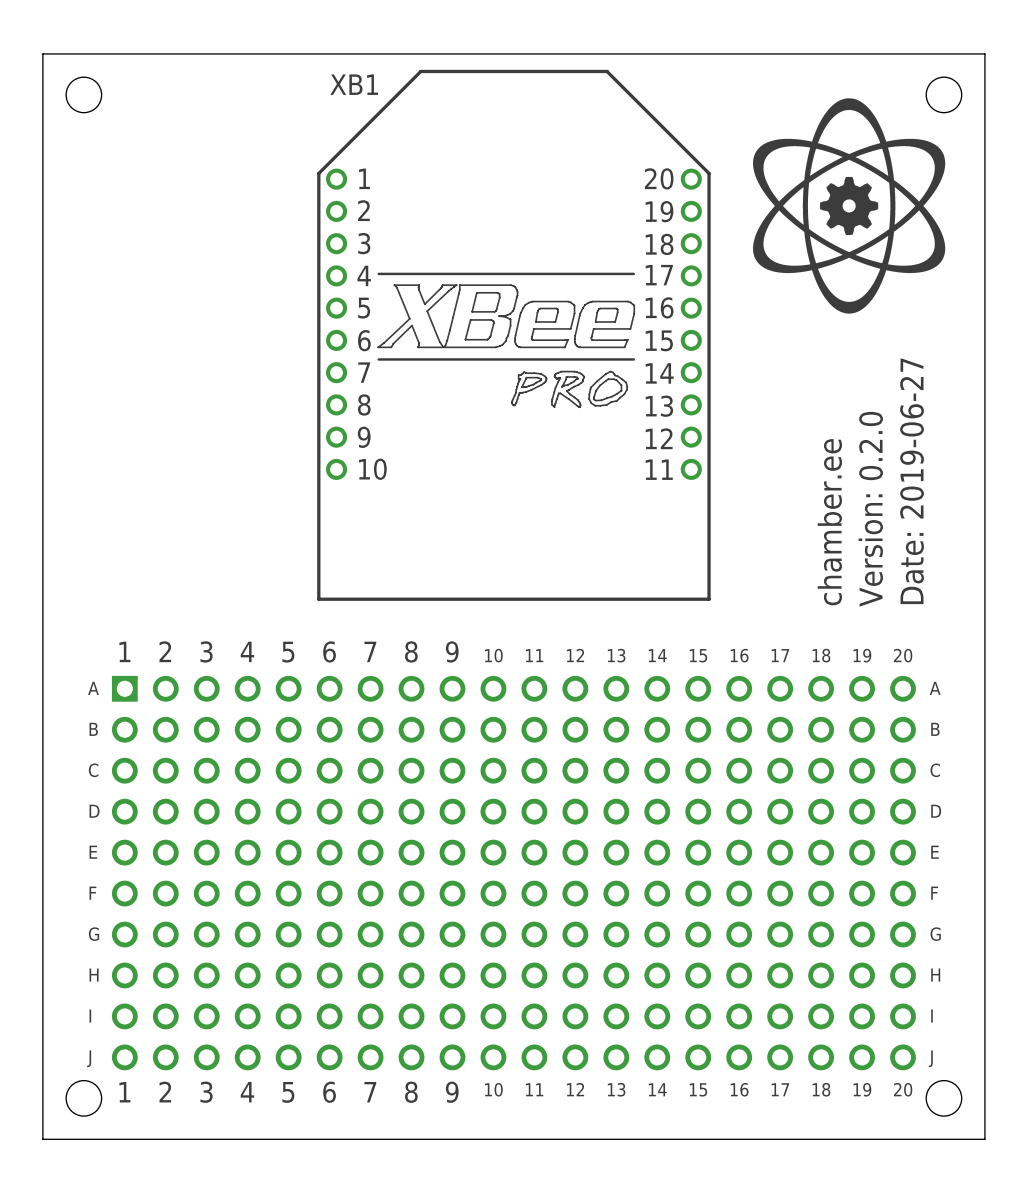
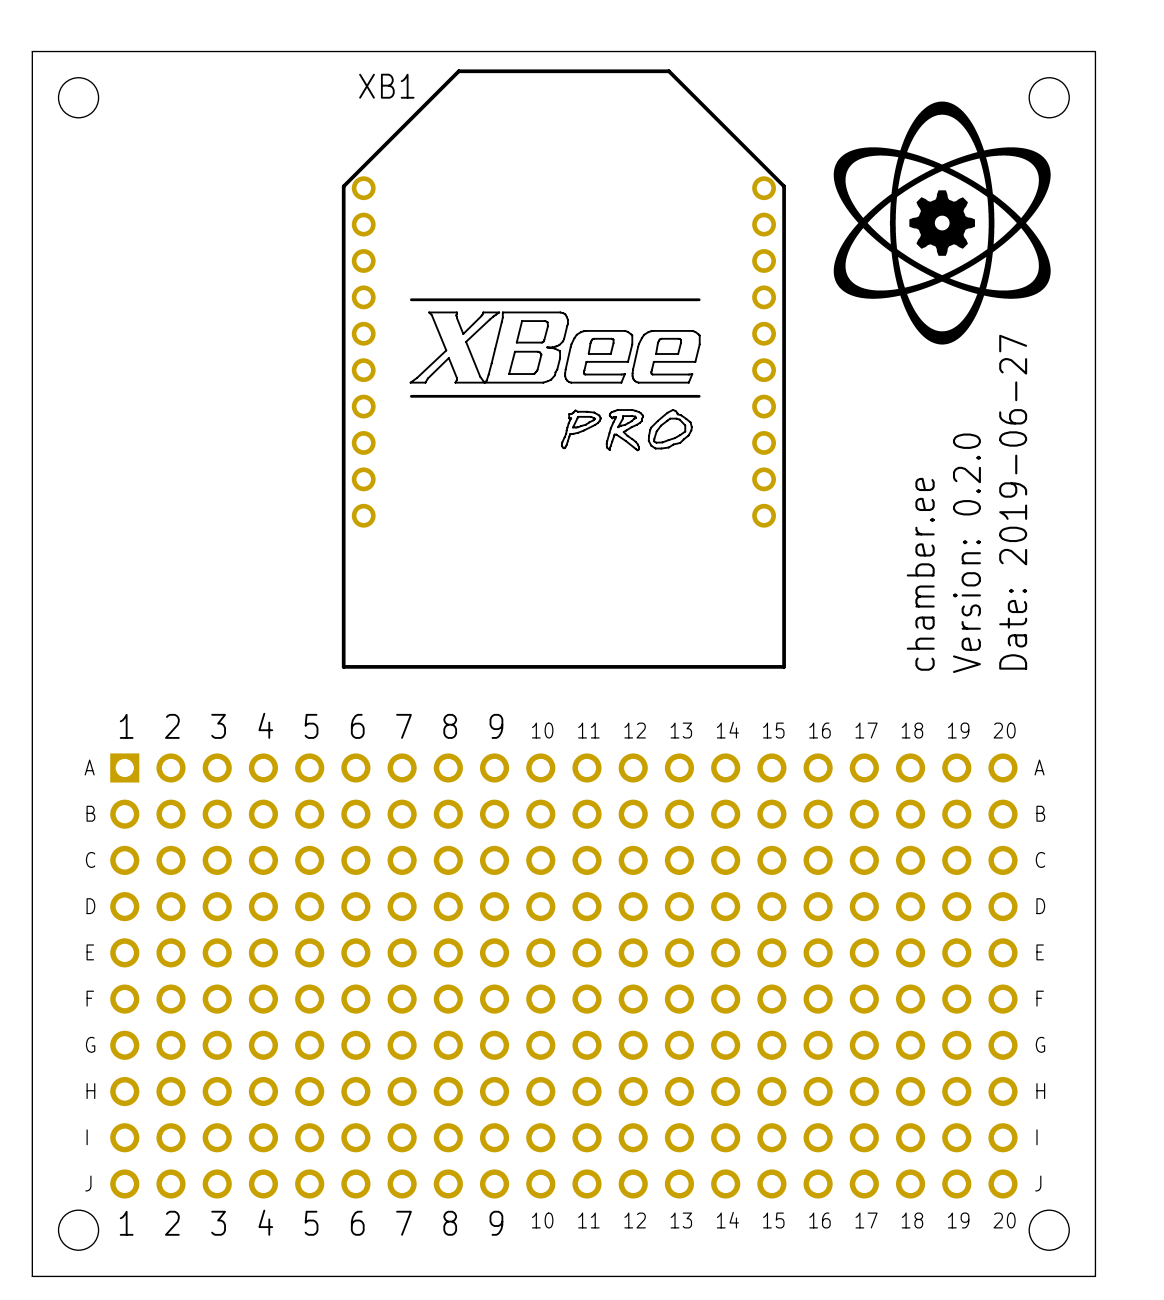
XB1 footprint: [317, 69, 711, 601] -> [341, 69, 786, 669]

